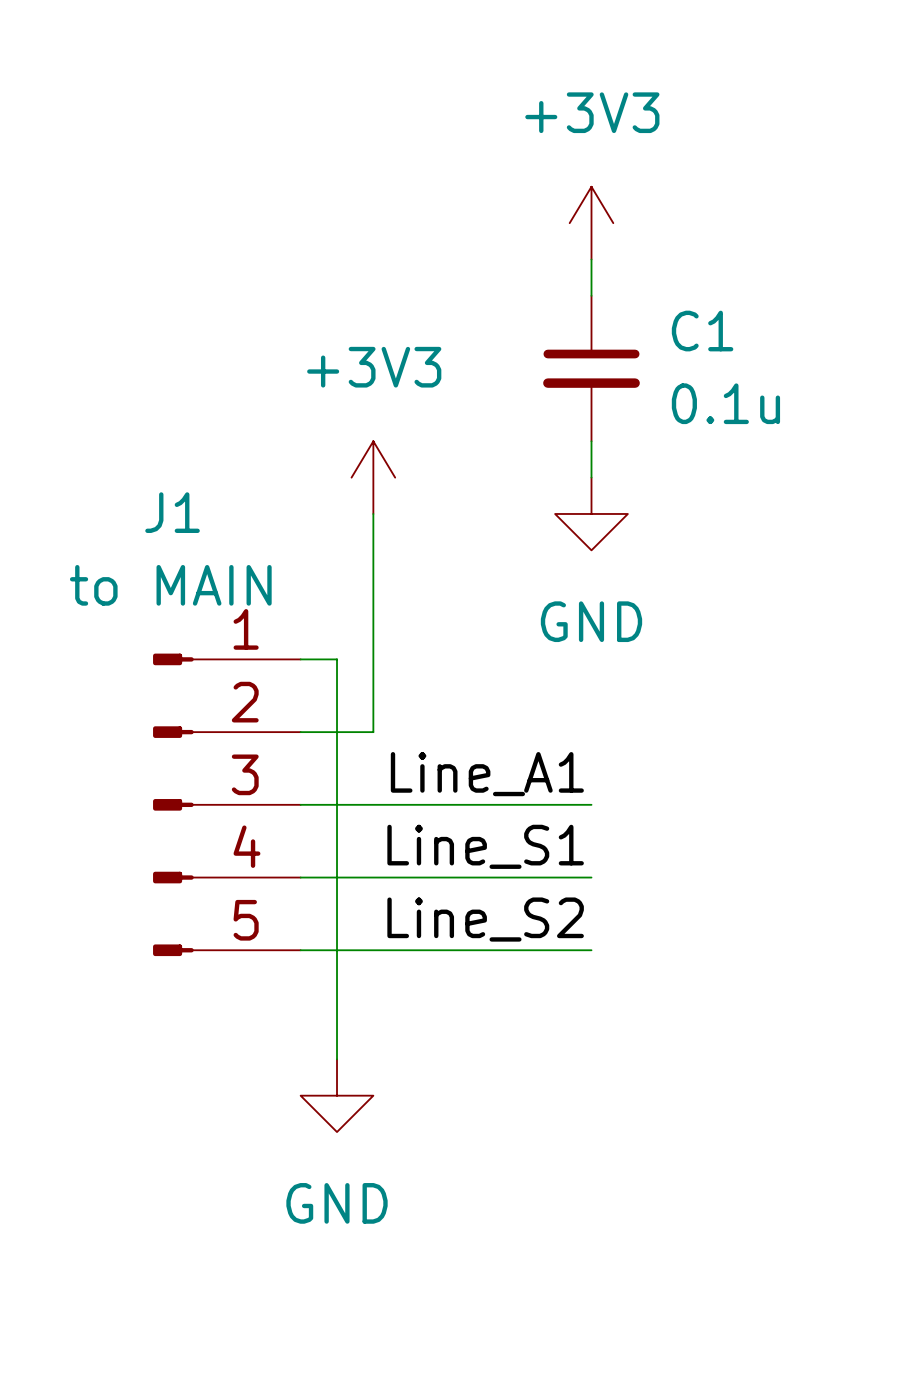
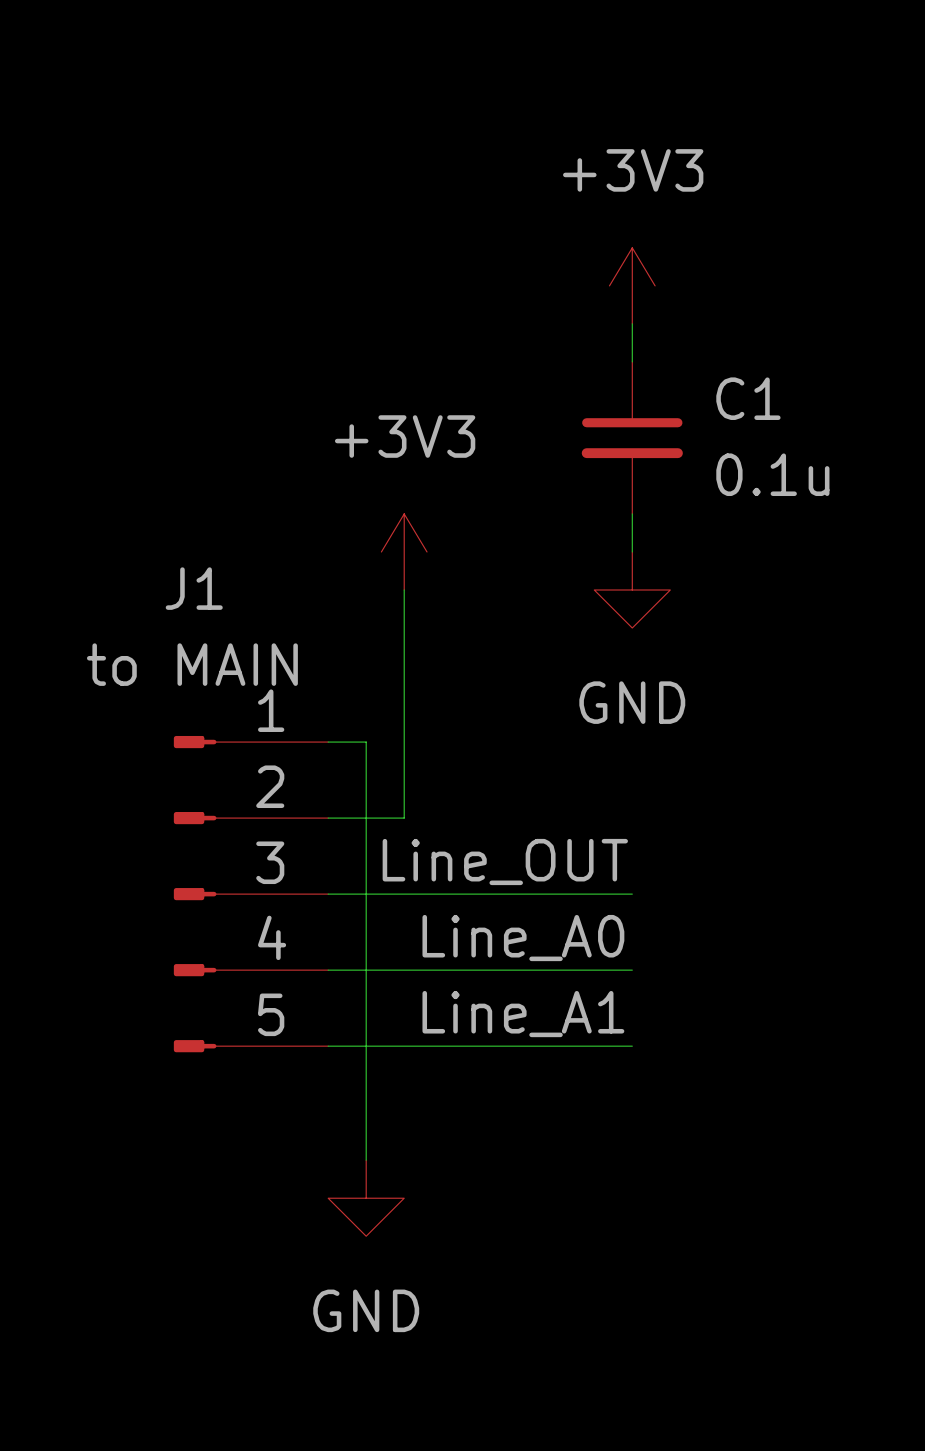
label: Line_A1 (487, 774) -> Line_OUT (505, 862)
label: Line_S1 (485, 846) -> Line_A0 (523, 938)
label: Line_S2 (485, 919) -> Line_A1 (523, 1014)

